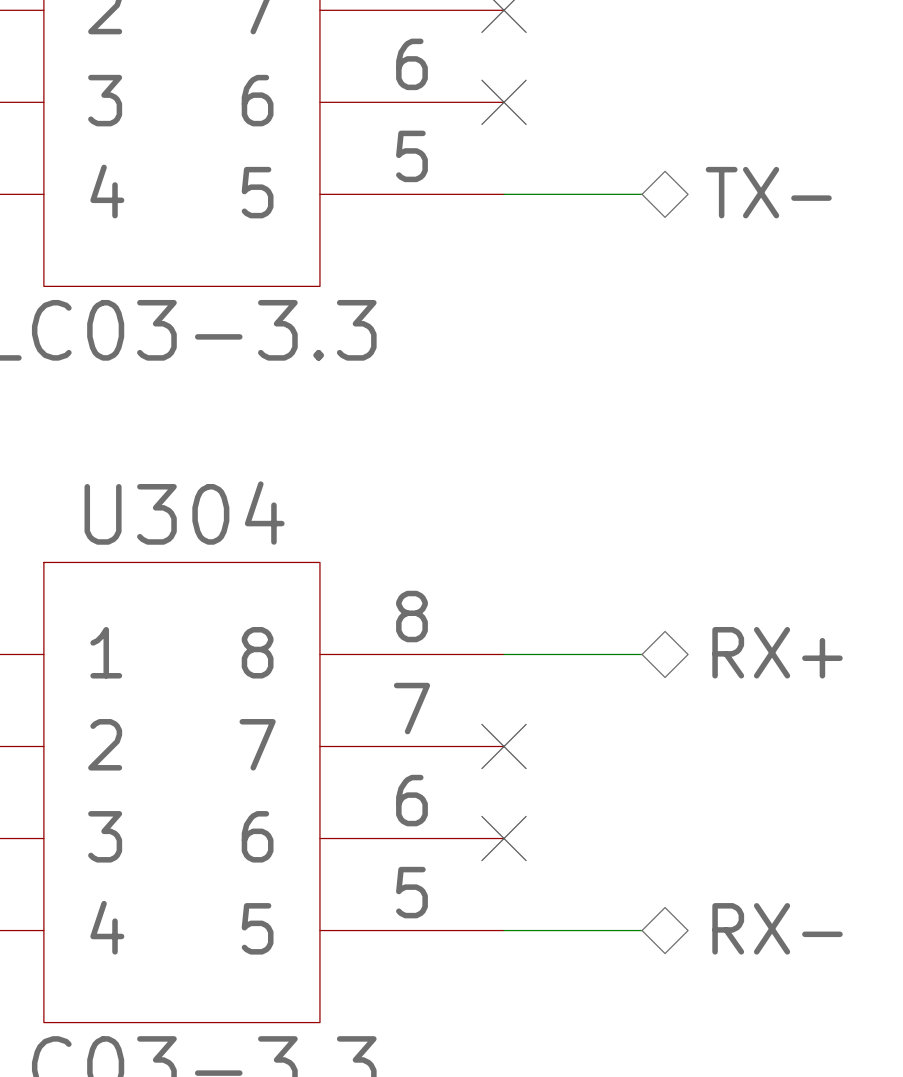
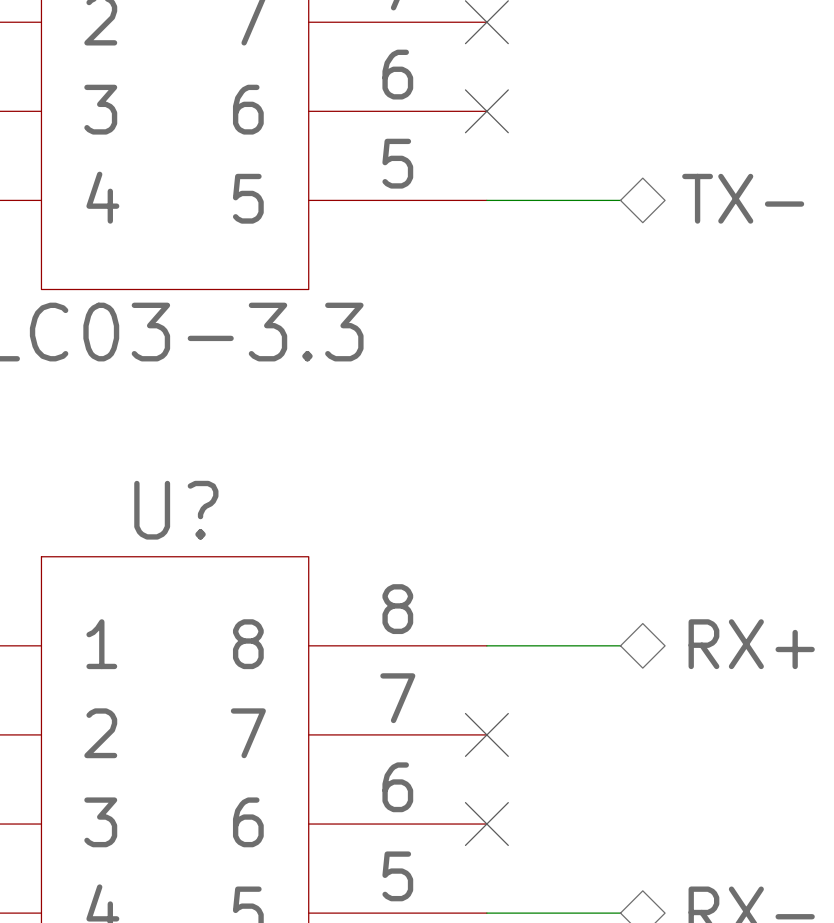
U304 name: U304 (184, 513) -> U? (176, 510)

